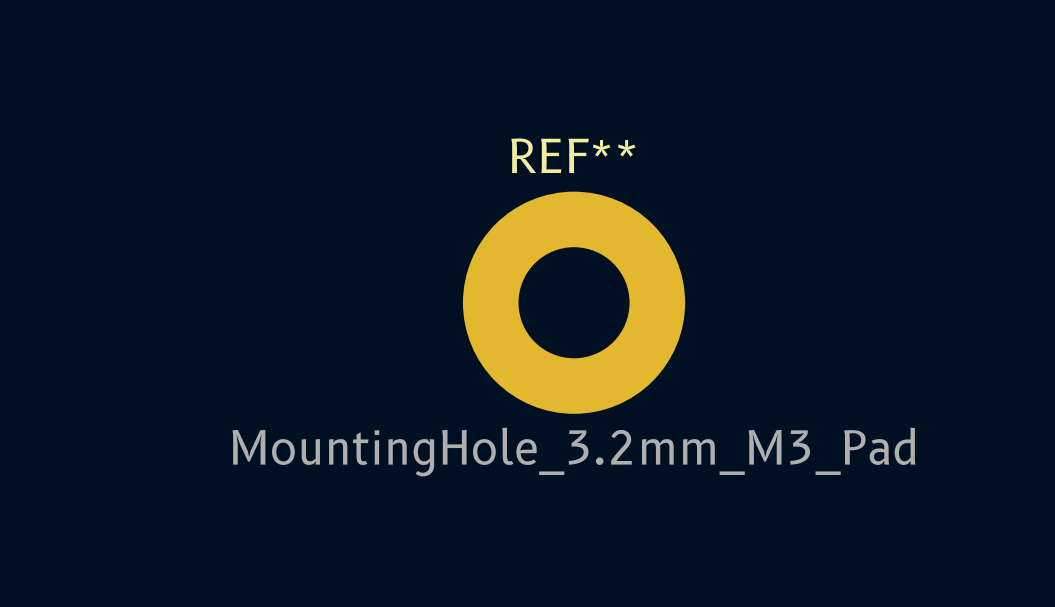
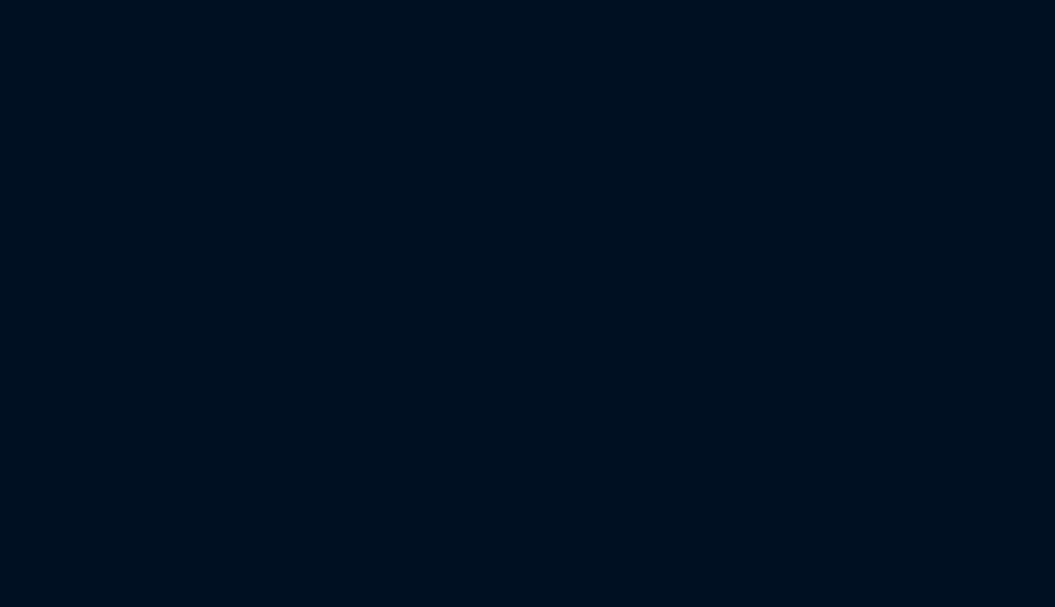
REF**: MountingHole_3.2mm_M3_Pad (574, 302) -> none

